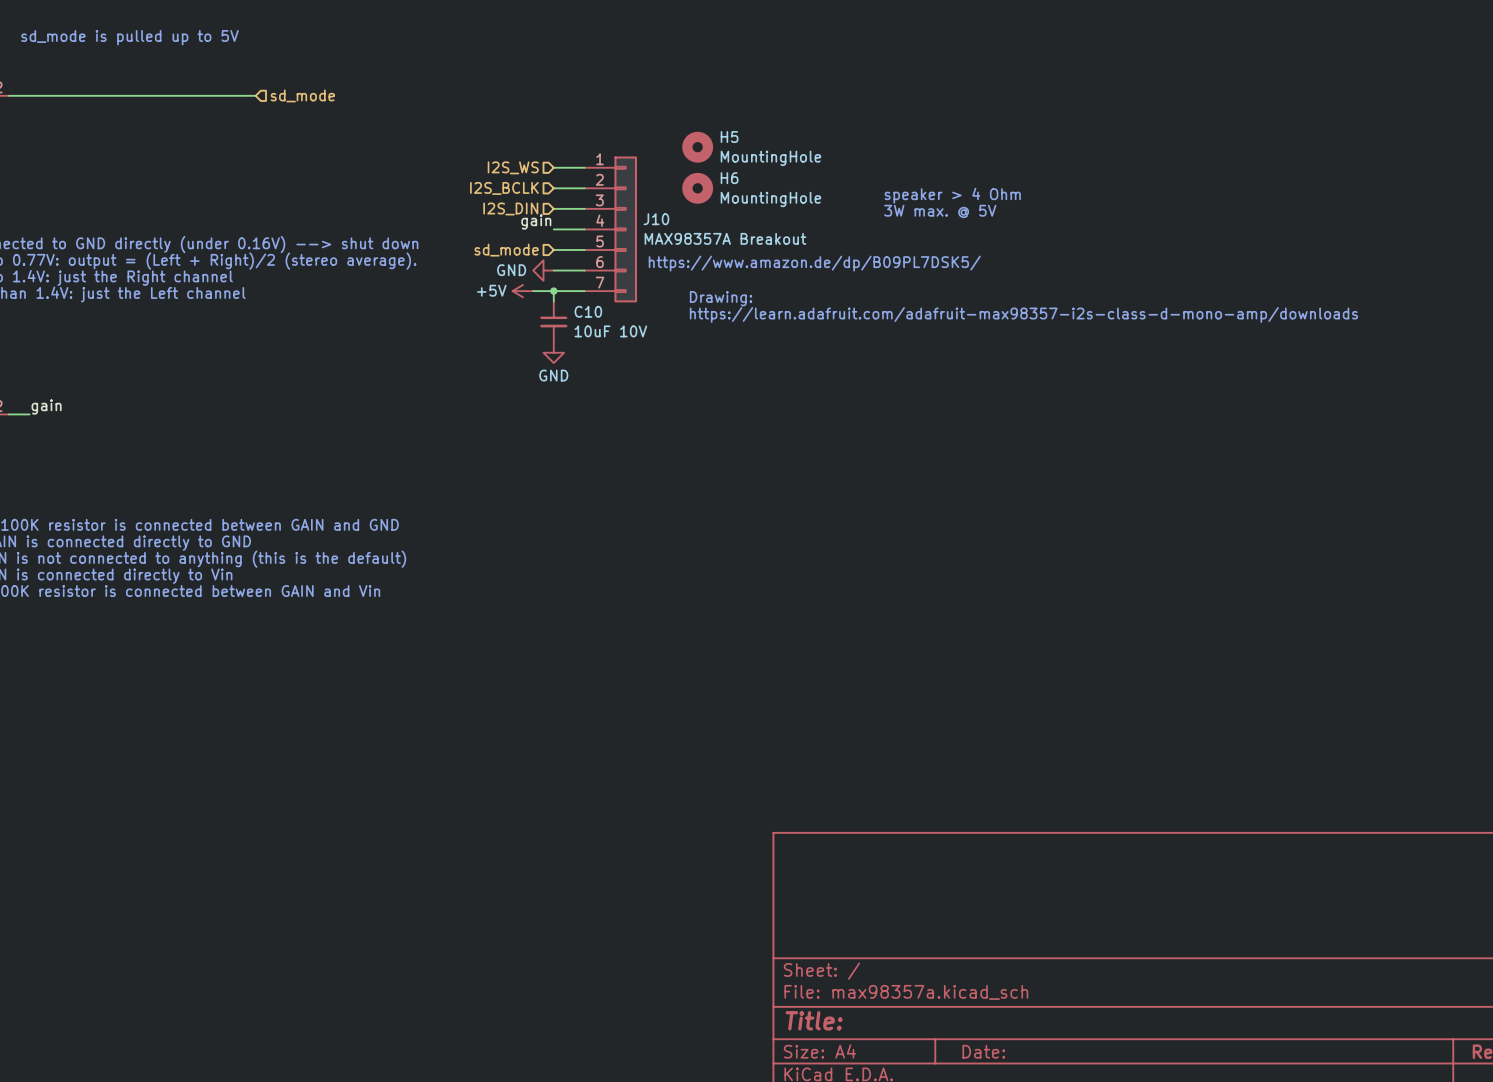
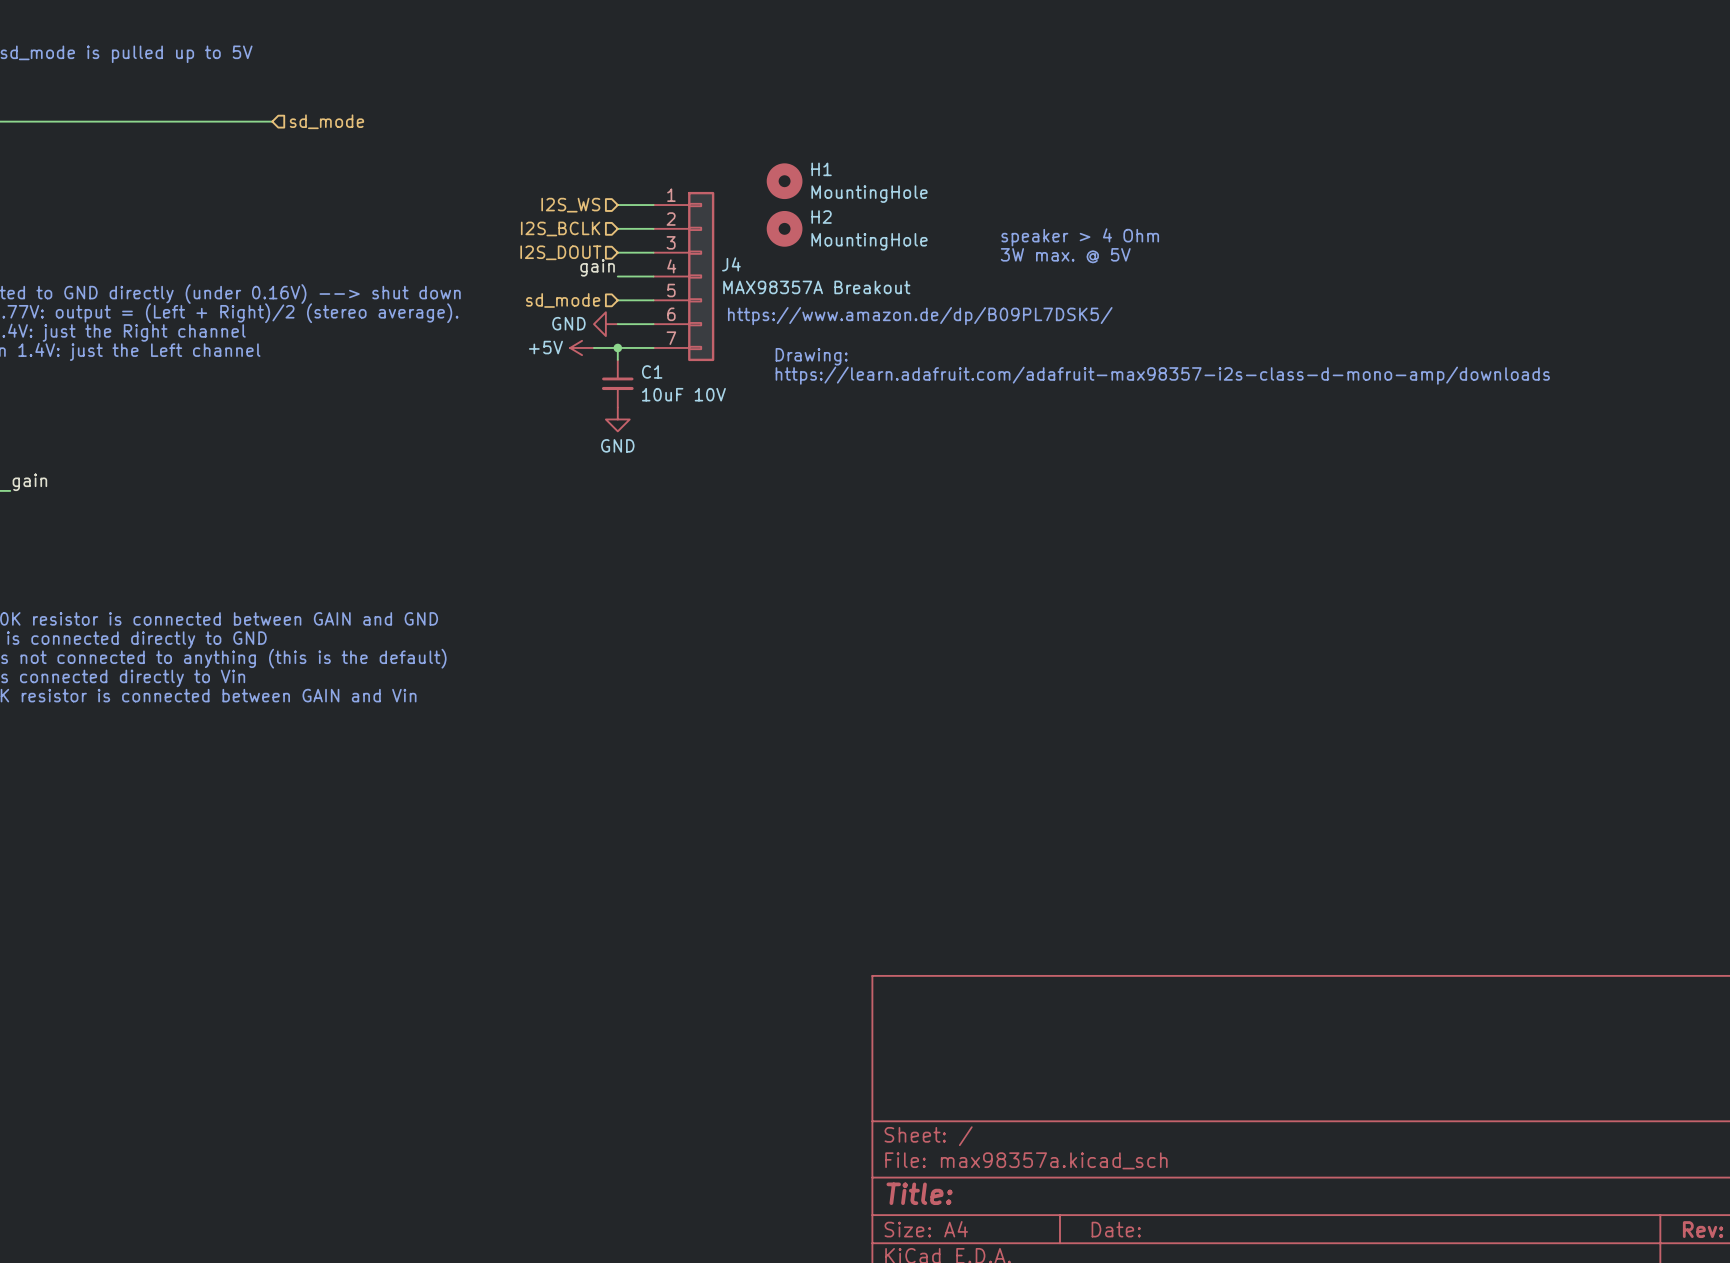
H5 name: H5 (729, 137) -> H1 (821, 169)
H6 name: H6 (729, 178) -> H2 (821, 217)
hierarchical label: I2S_DIN (510, 208) -> I2S_DOUT (560, 252)
J10 name: J10 (656, 219) -> J4 (731, 264)
C10 name: C10 (588, 311) -> C1 (652, 371)

